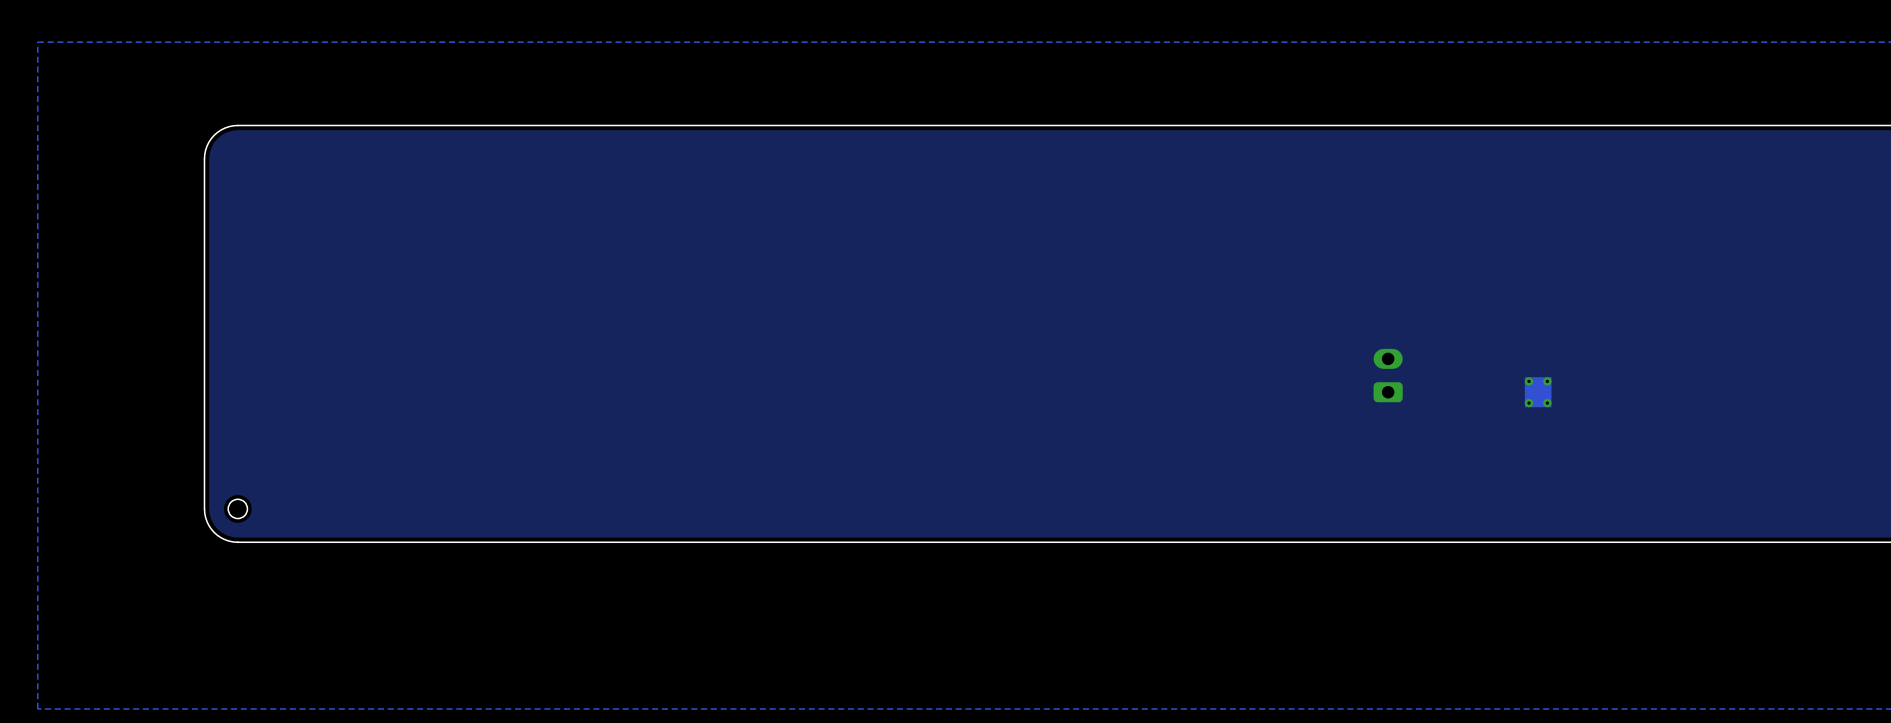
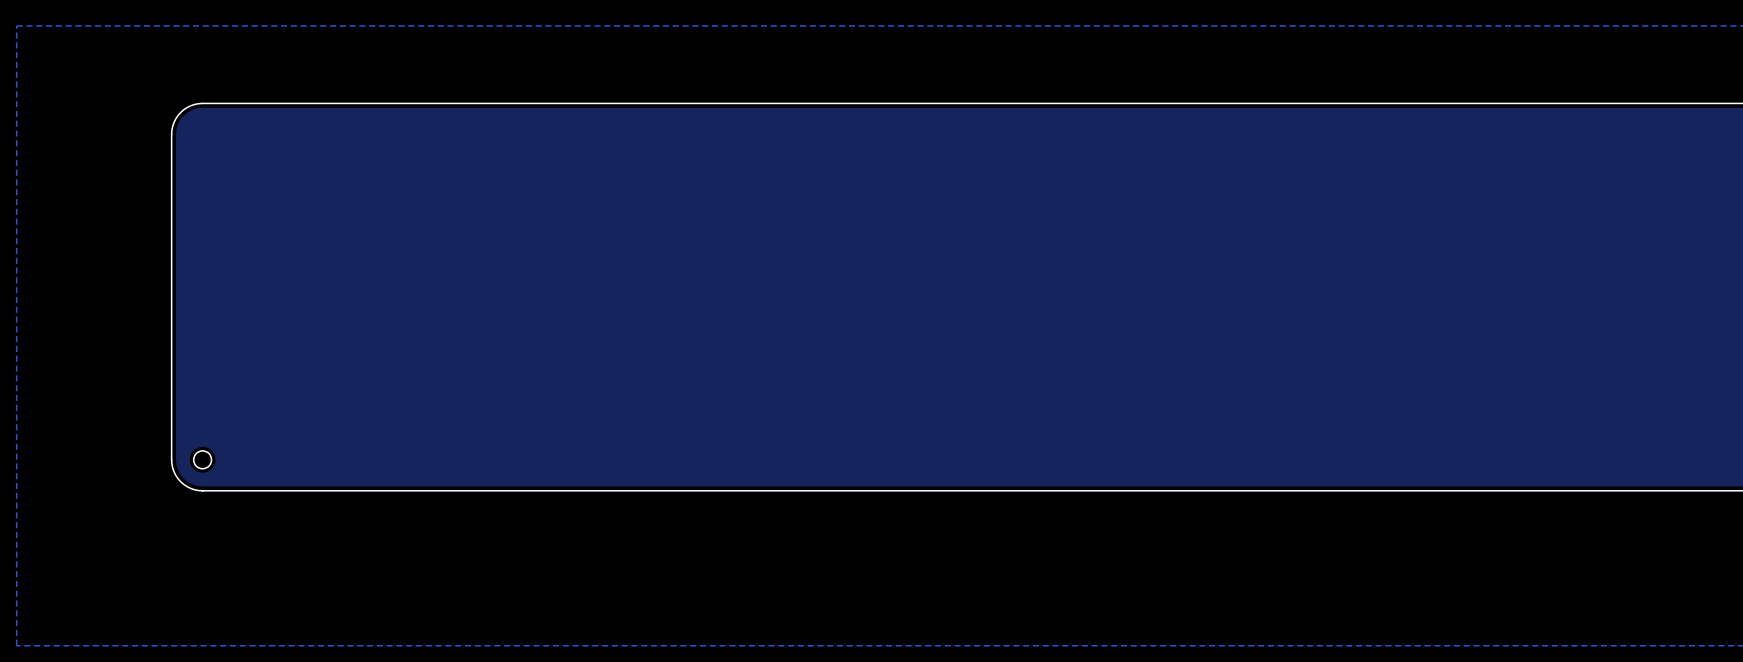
part: (1388, 375) -> none
part: (1538, 392) -> none

